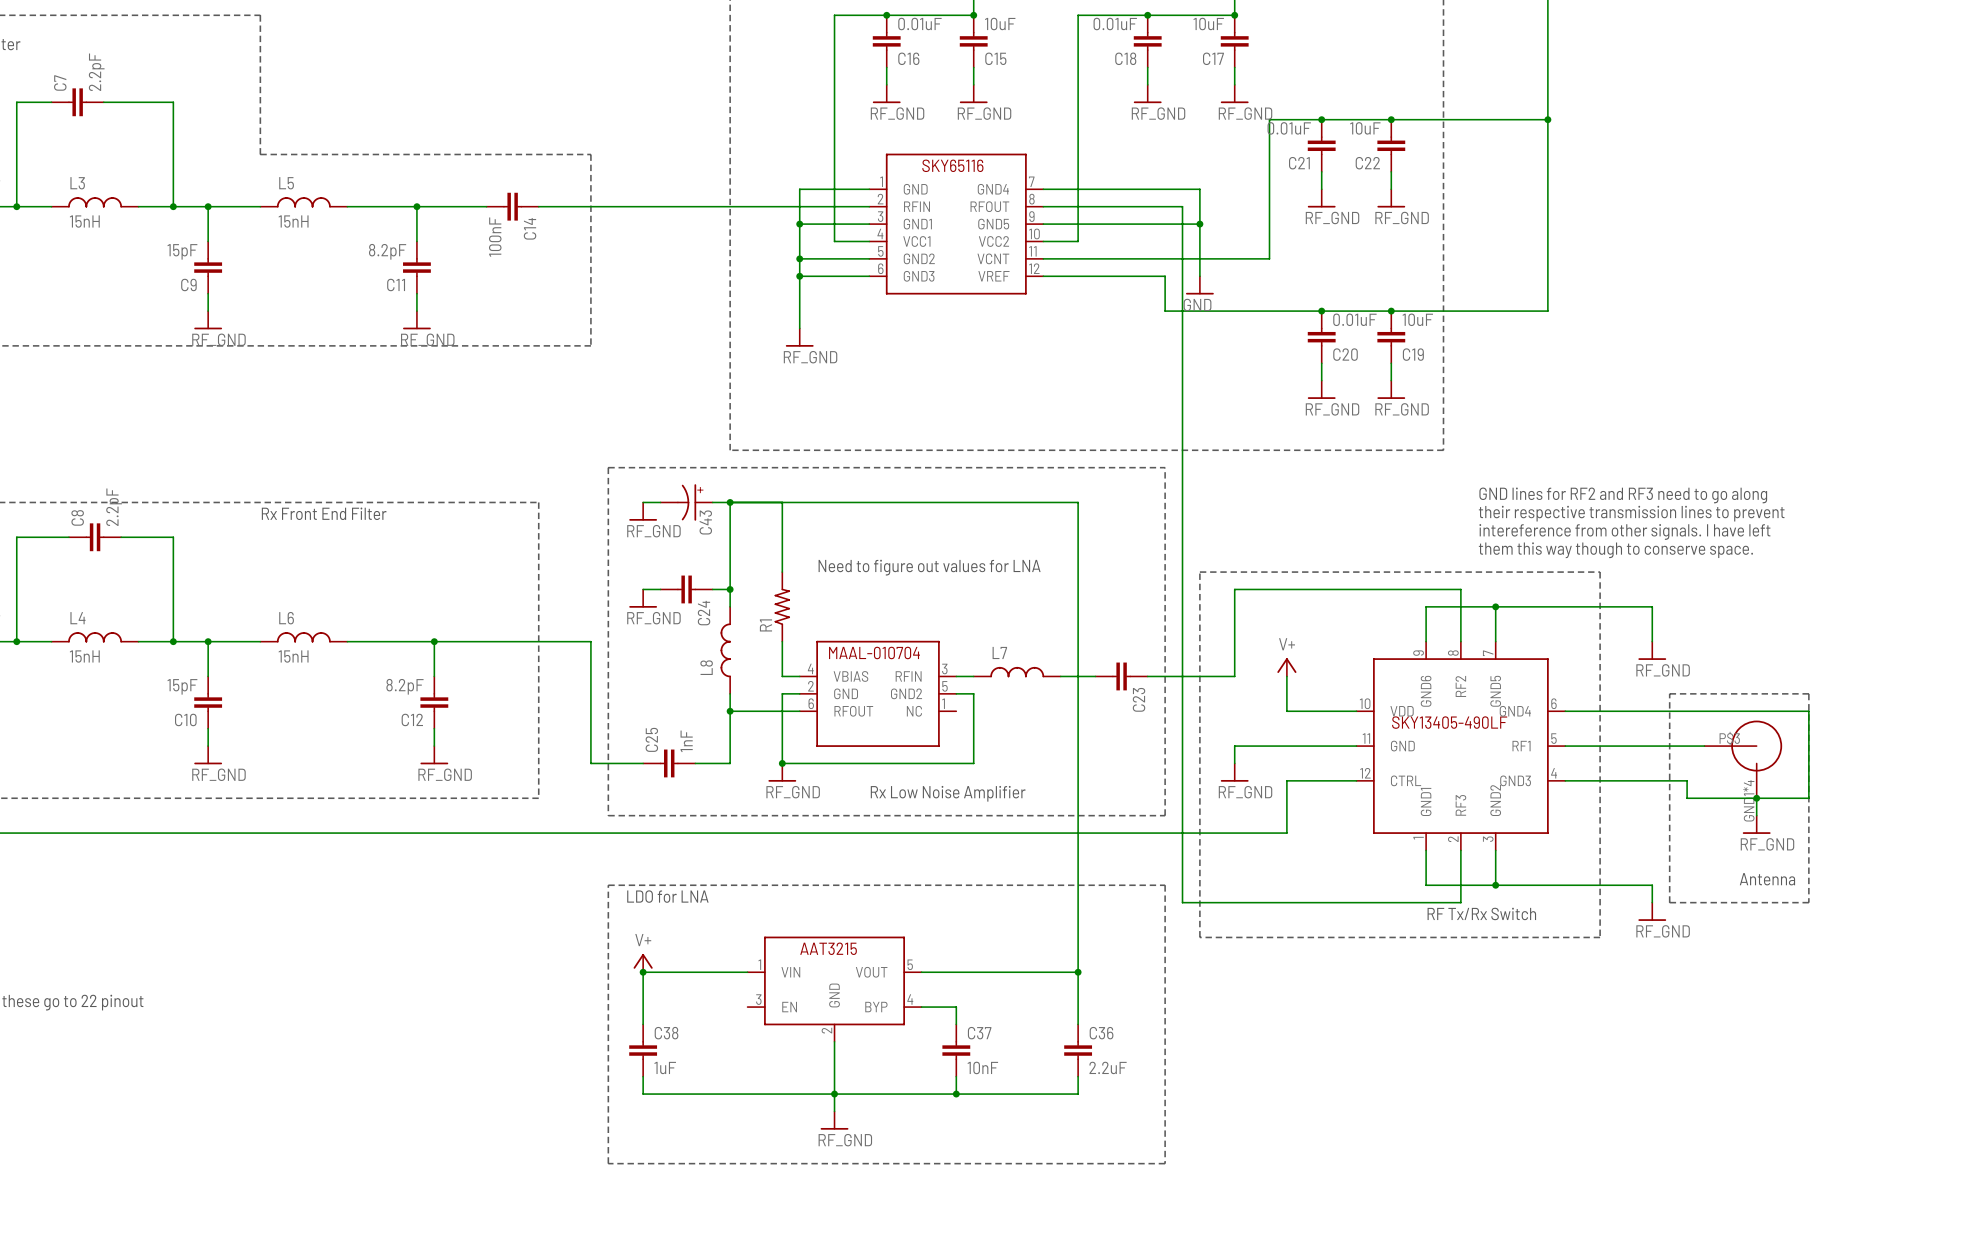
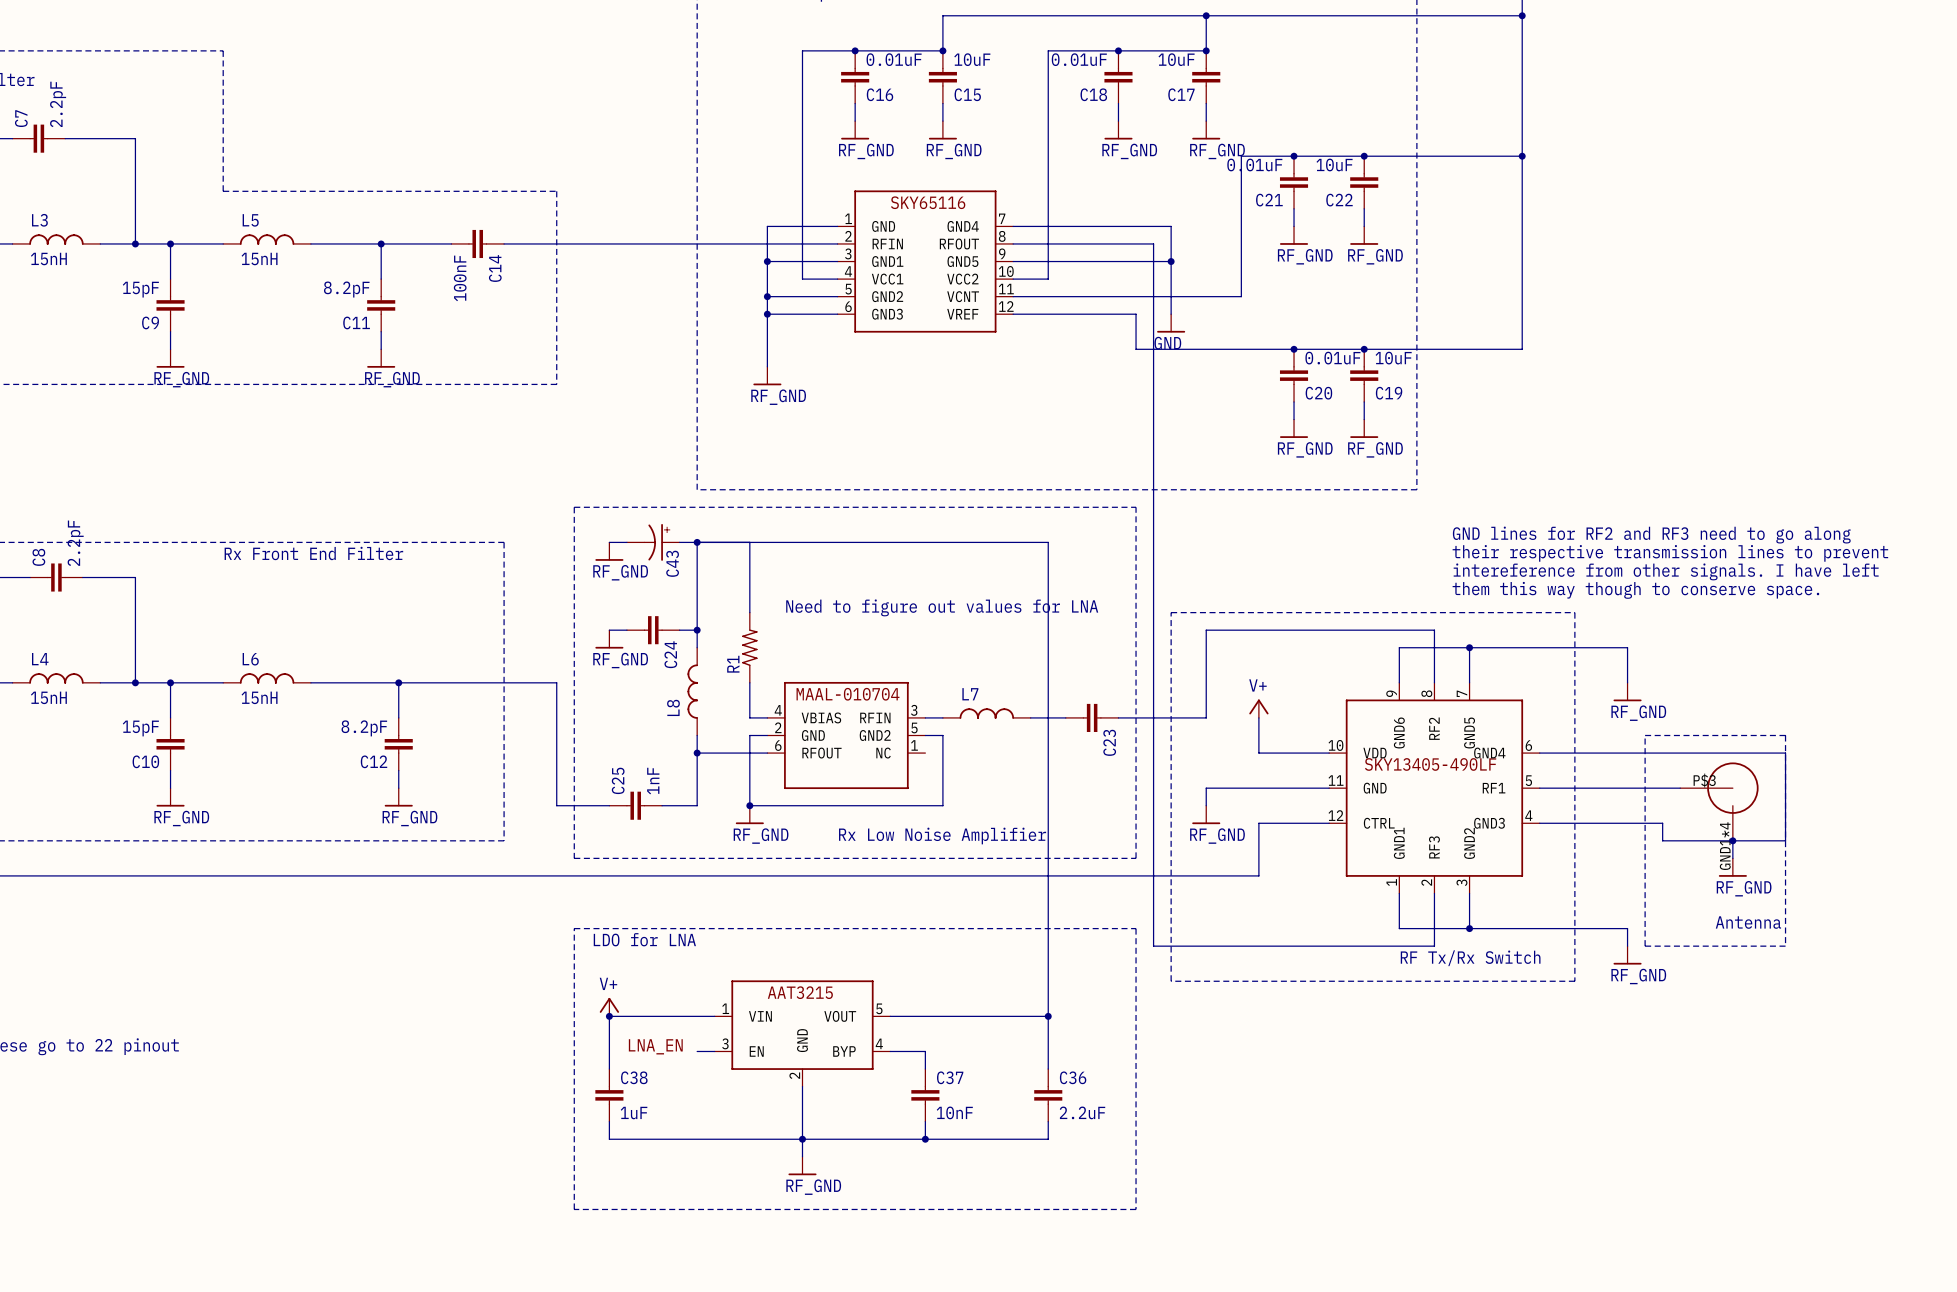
label: none -> LNA_EN (655, 1046)
wire: none -> (697, 1051) (714, 1051)

